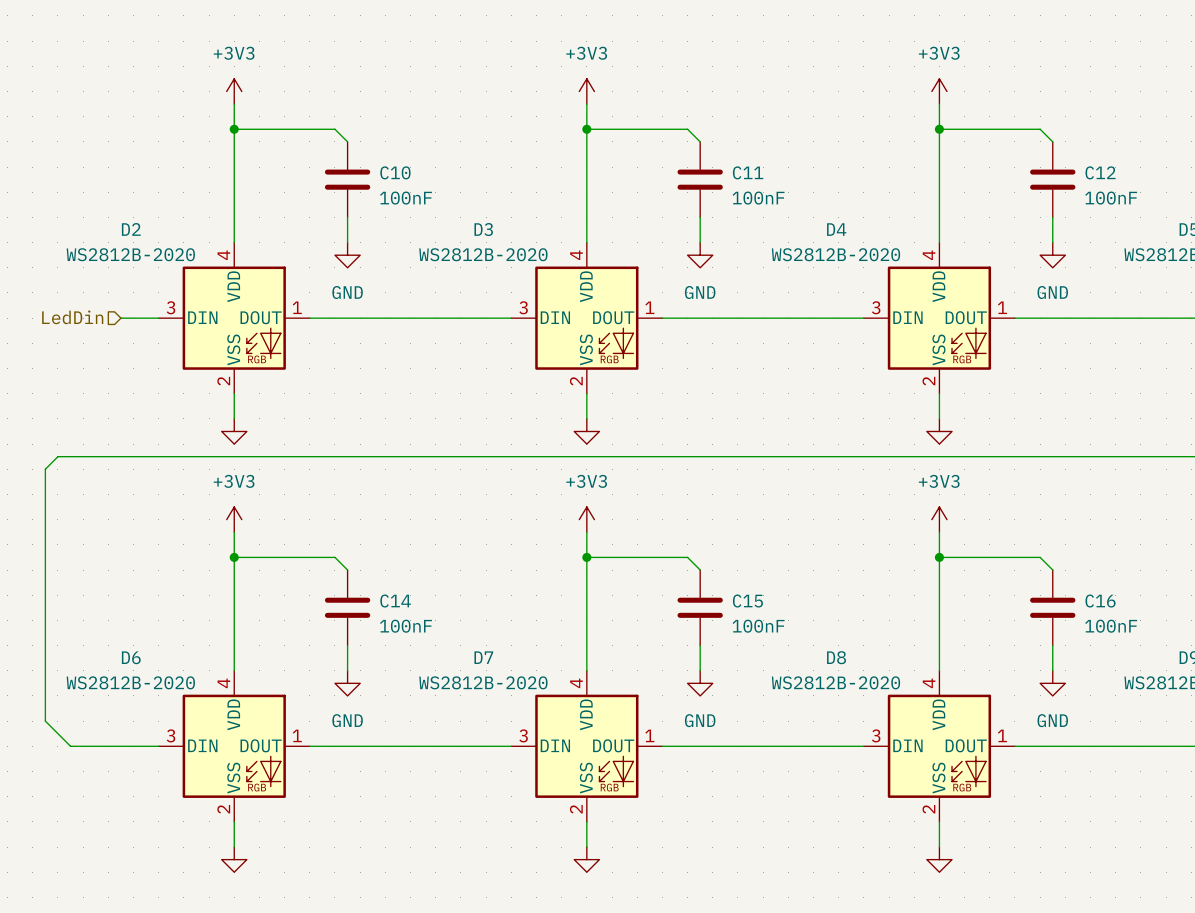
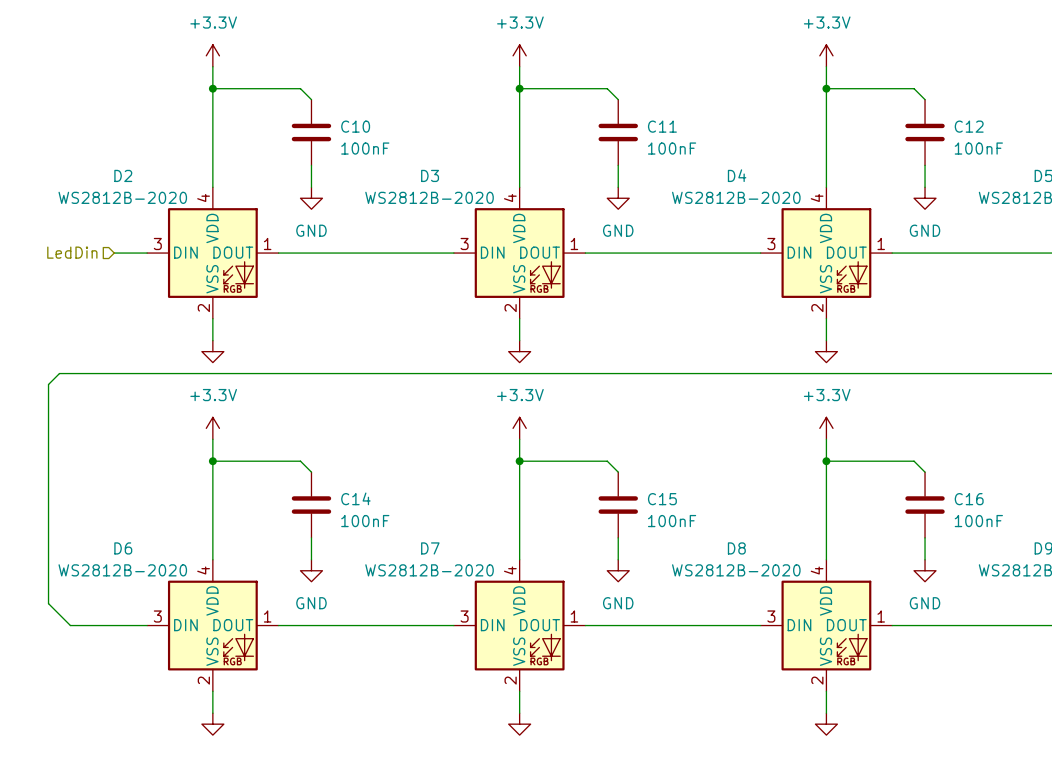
power symbol: +3V3 (234, 91) -> +3.3V (212, 55)
power symbol: +3V3 (586, 91) -> +3.3V (519, 55)
power symbol: +3V3 (939, 91) -> +3.3V (826, 55)
power symbol: +3V3 (234, 519) -> +3.3V (212, 428)
power symbol: +3V3 (586, 519) -> +3.3V (519, 428)
power symbol: +3V3 (939, 519) -> +3.3V (826, 428)

